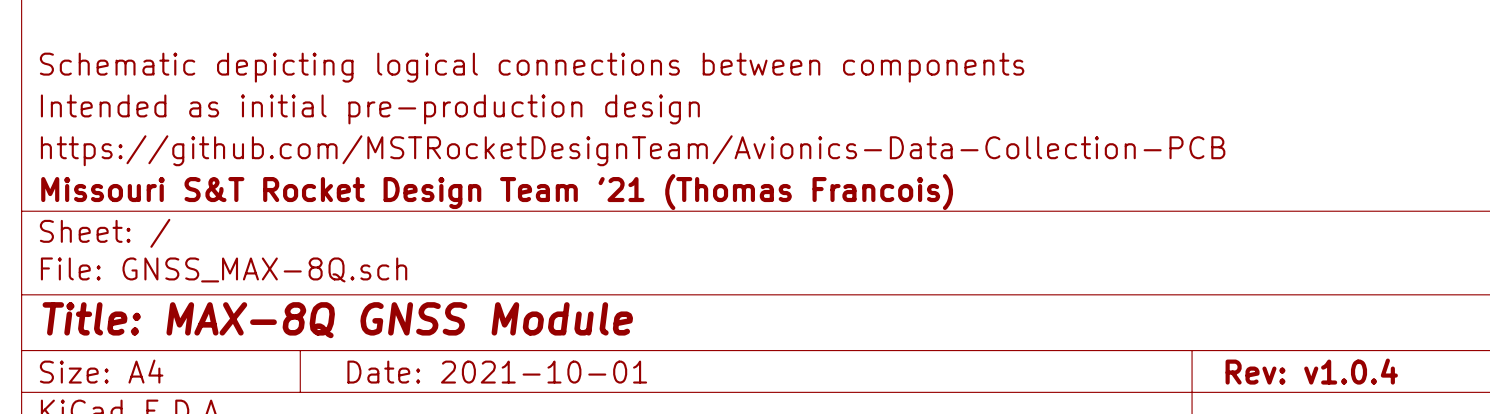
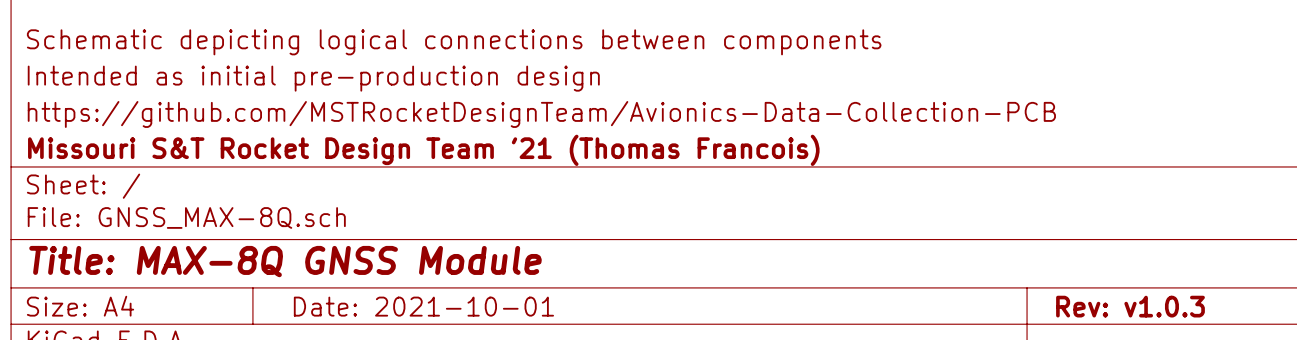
title block: Rev: v1.0.4 (1311, 371) -> Rev: v1.0.3 (1130, 306)

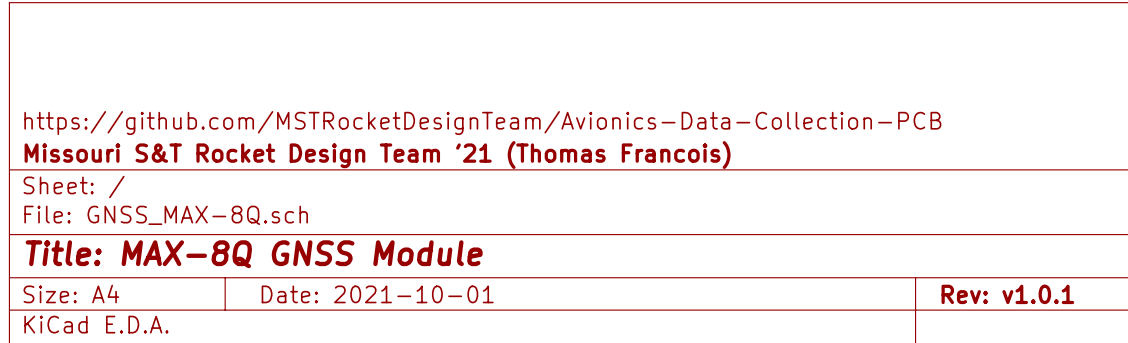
title block: Schematic depicting logical connections between components (454, 42) -> none
title block: Intended as initial pre-production design (313, 78) -> none
title block: Rev: v1.0.3 (1130, 306) -> Rev: v1.0.1 (1007, 294)

